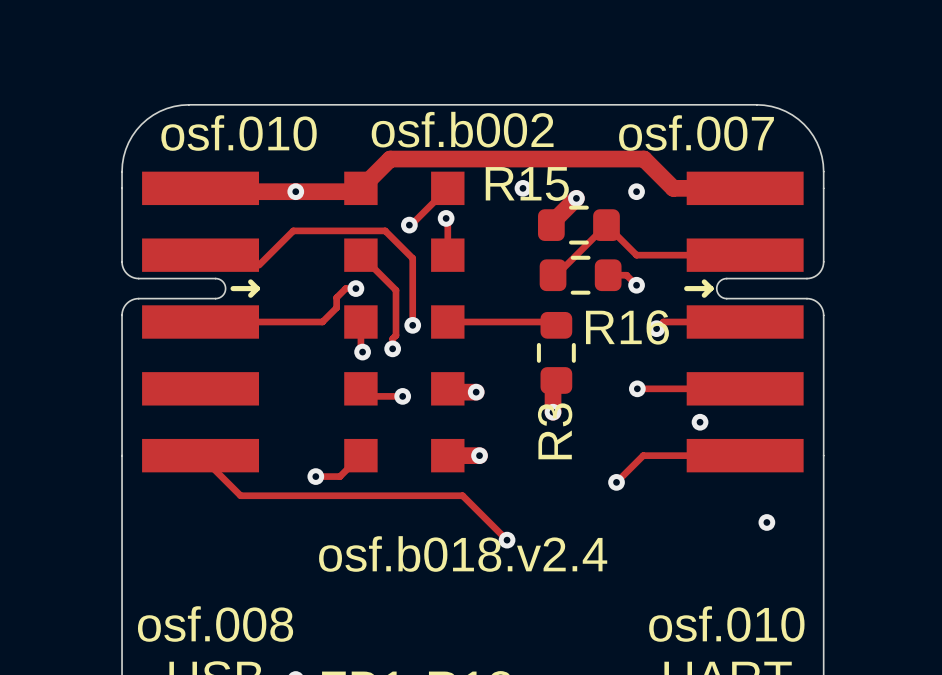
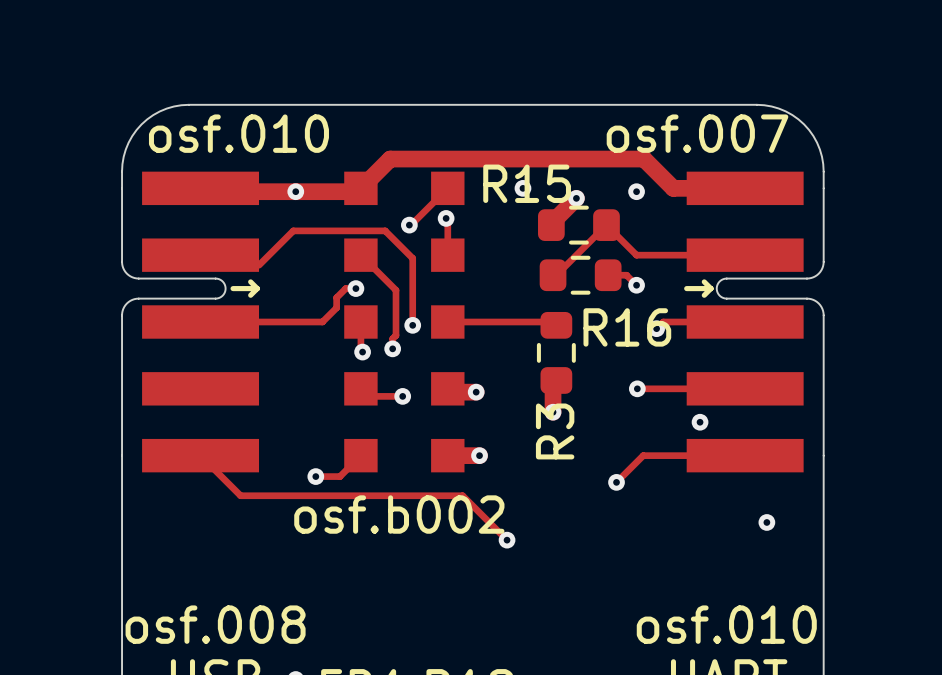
text position: osf.b002 (462, 129) -> osf.b002 (399, 514)
text: osf.b018.v2.4 (463, 553) -> none

